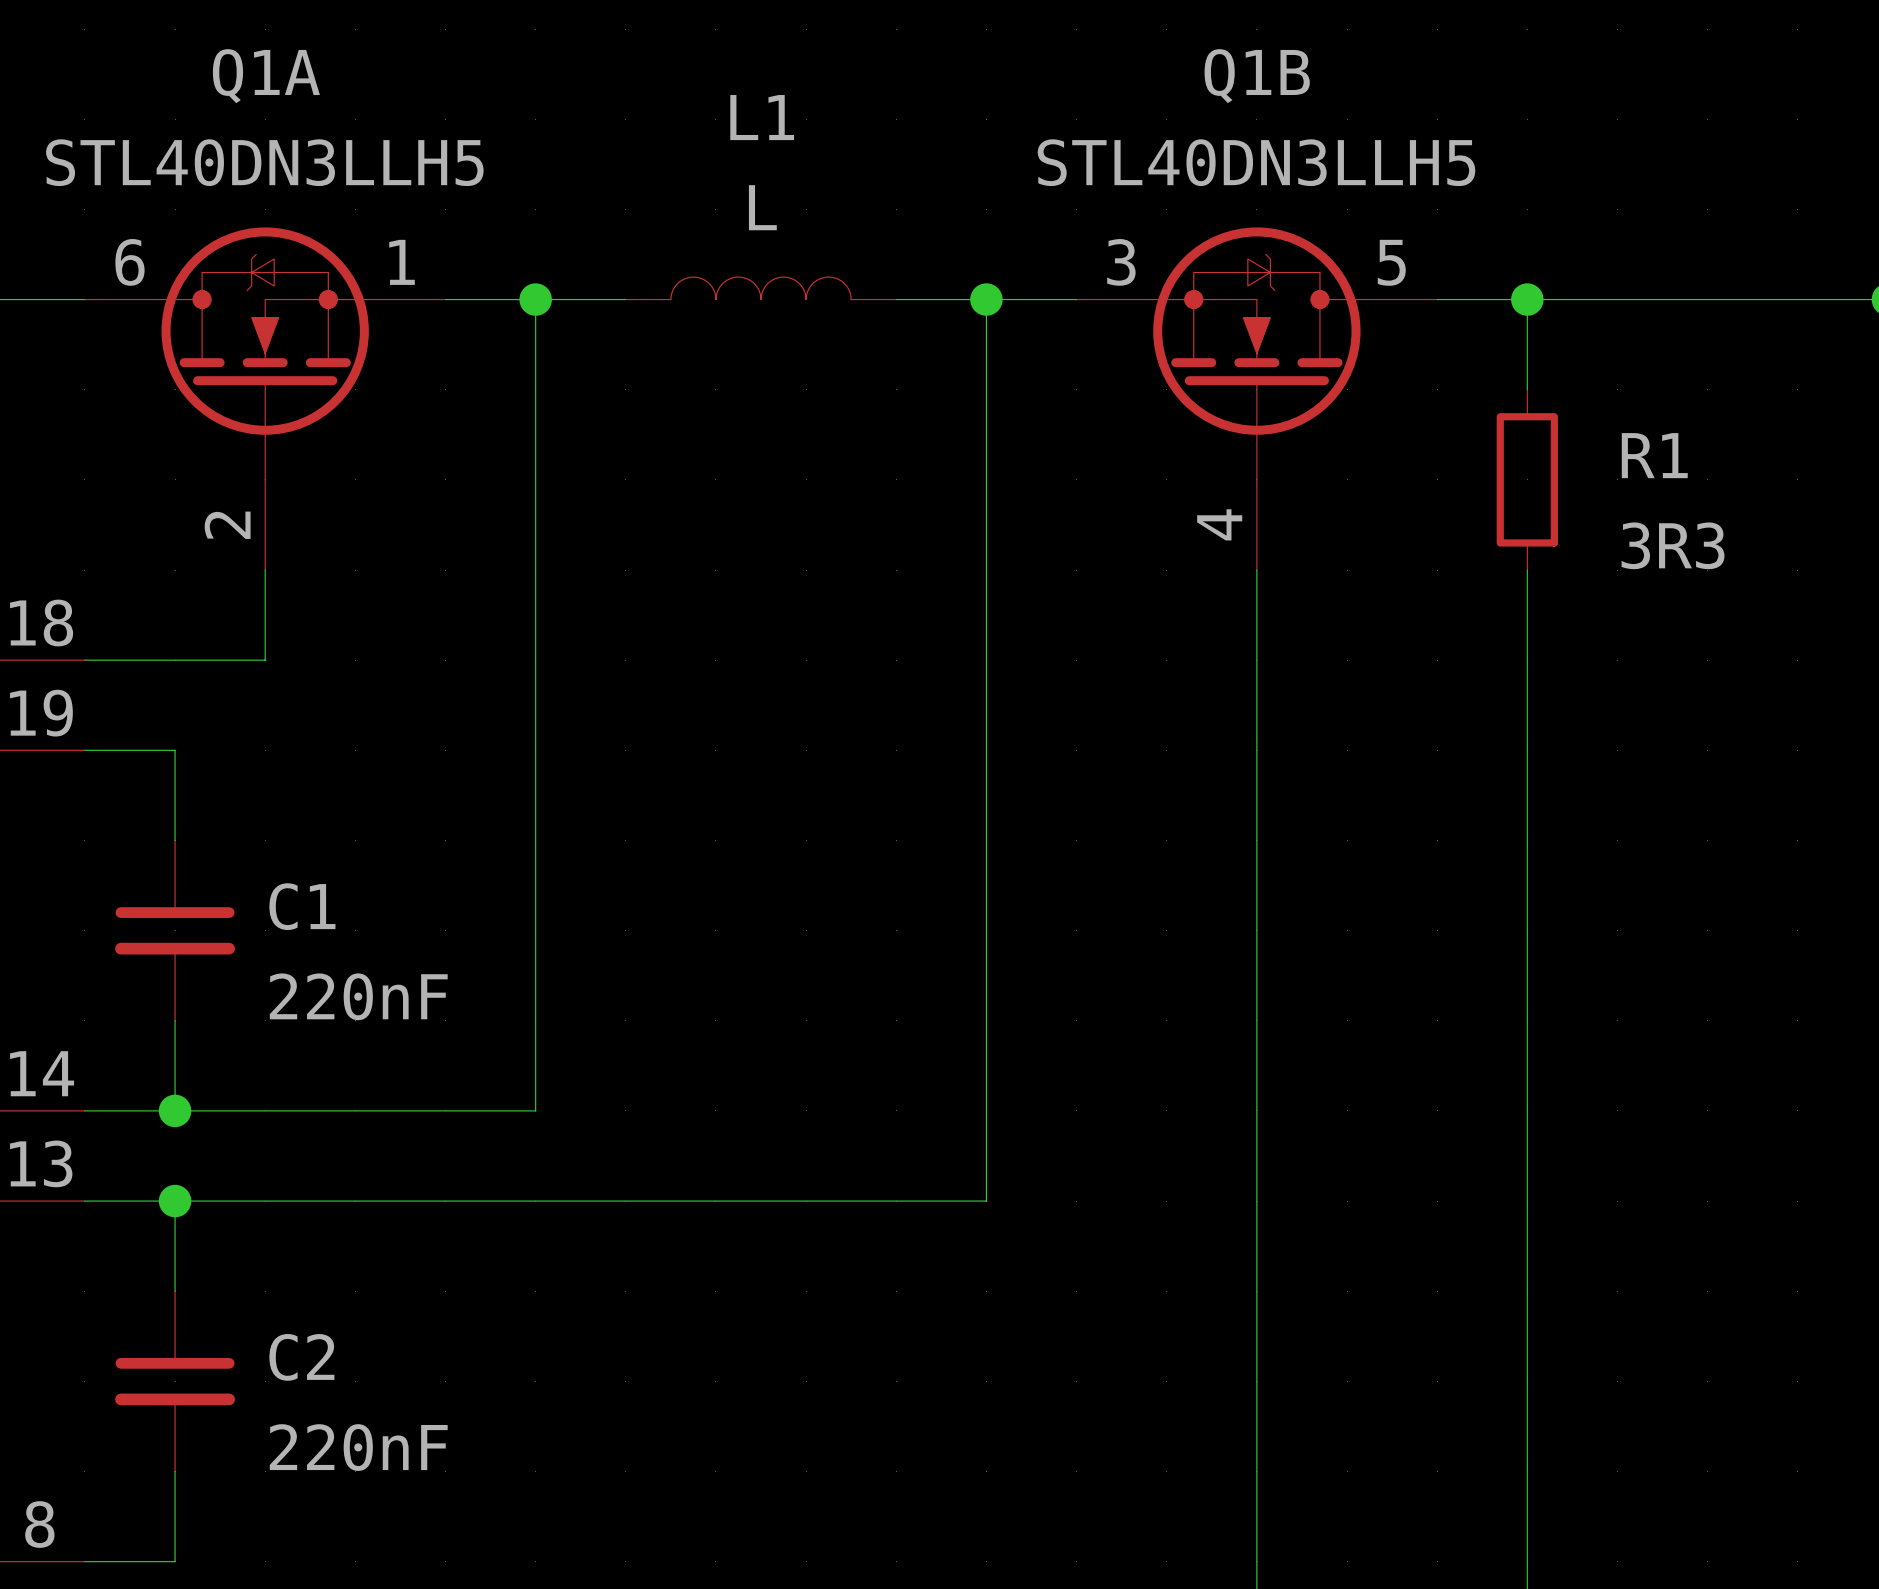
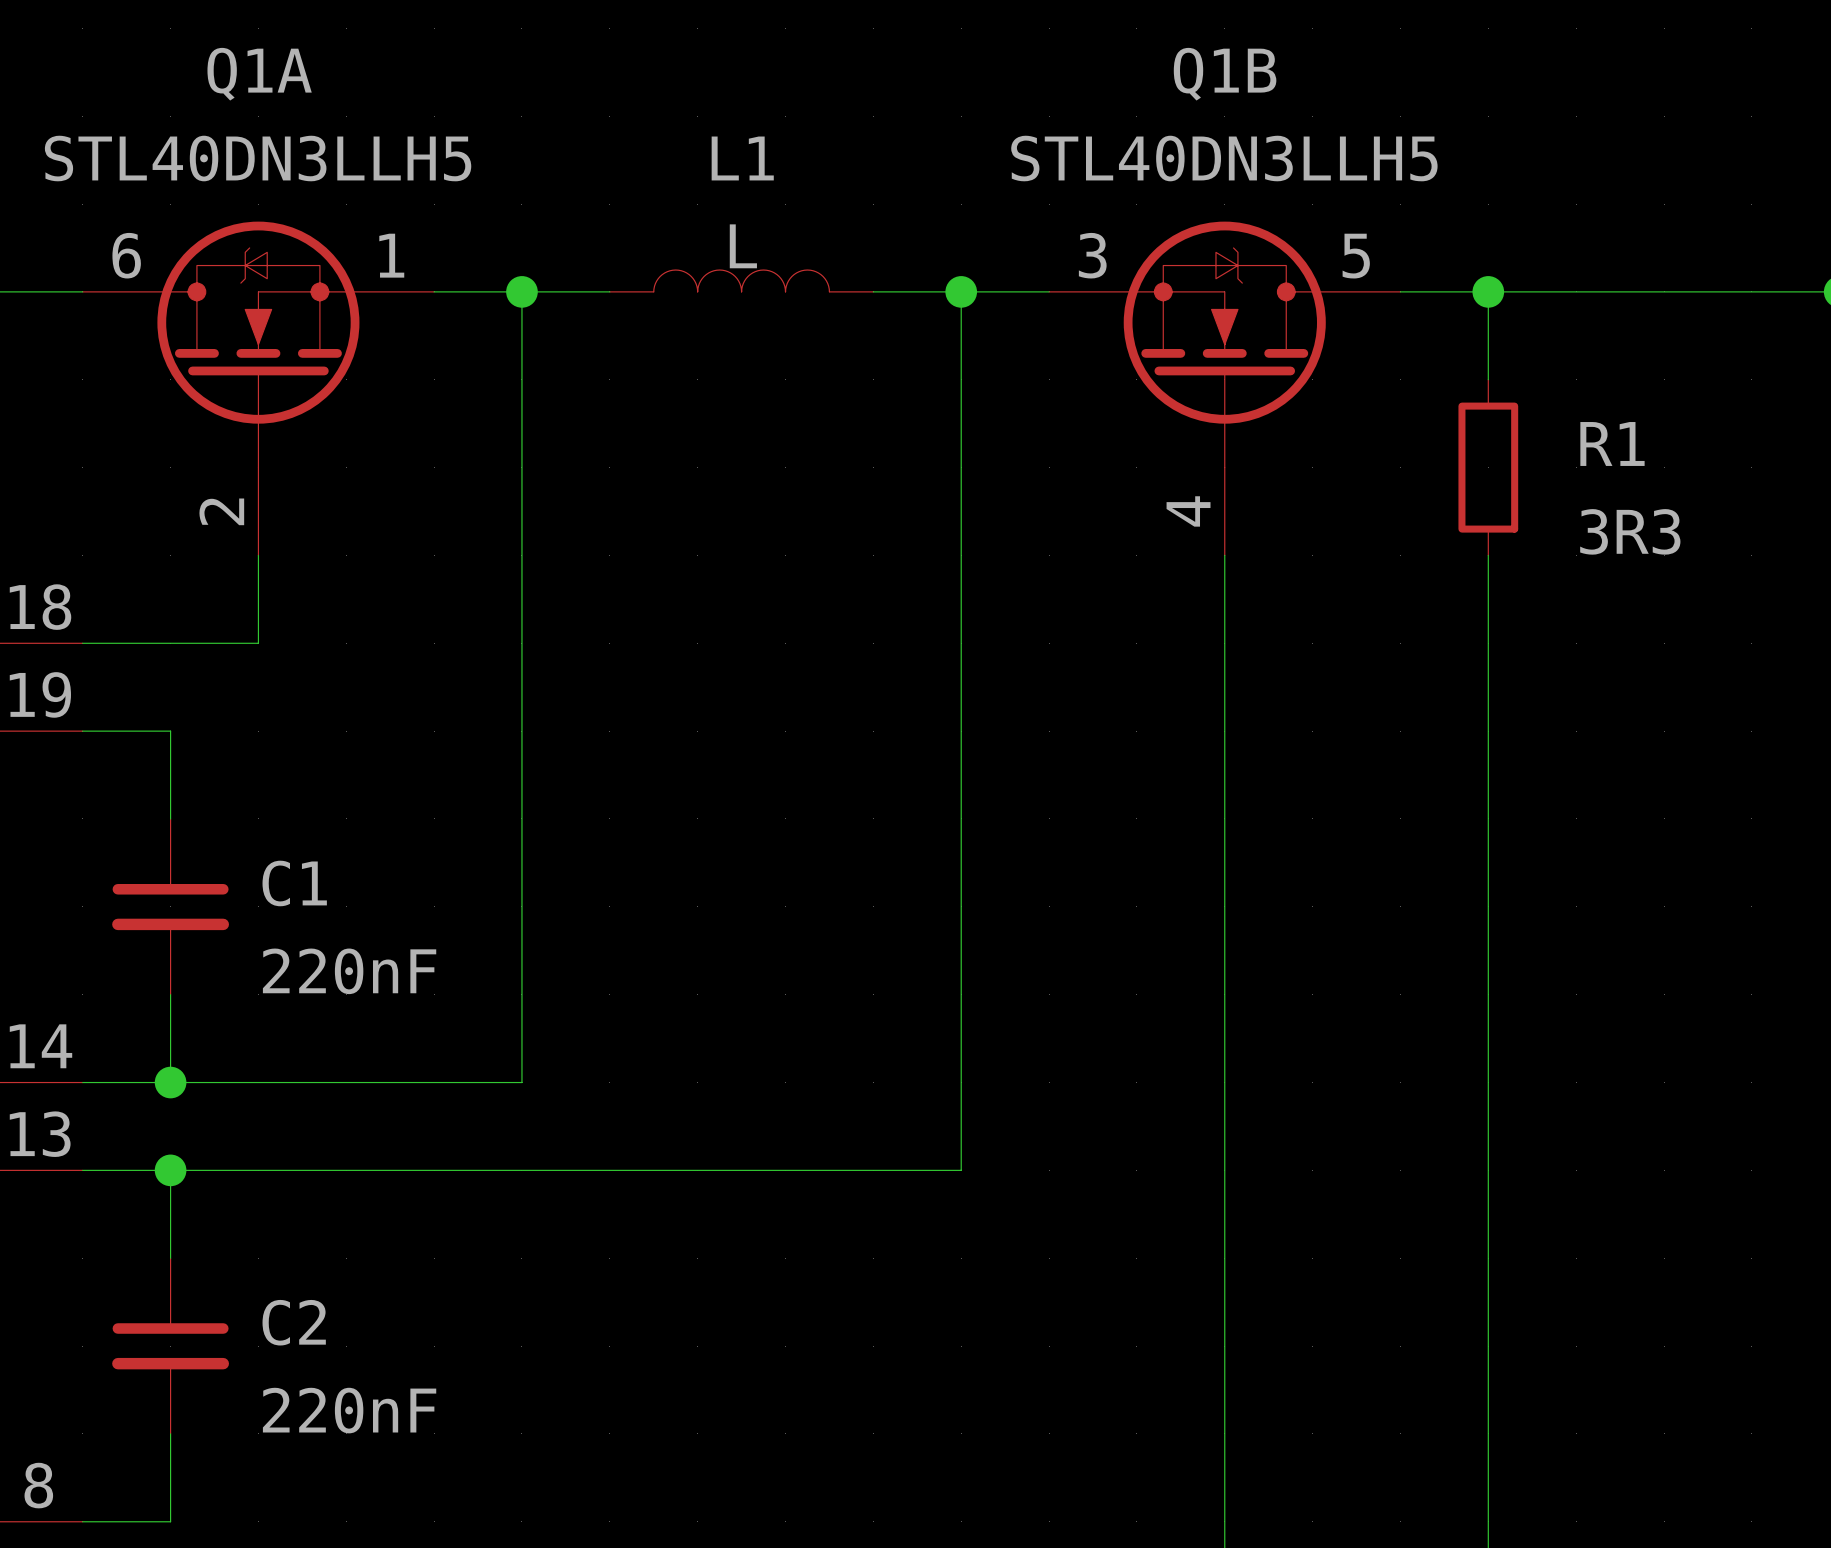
L1 name position: L1 (762, 117) -> L1 (742, 158)
L1 value position: L (762, 207) -> L (743, 246)

